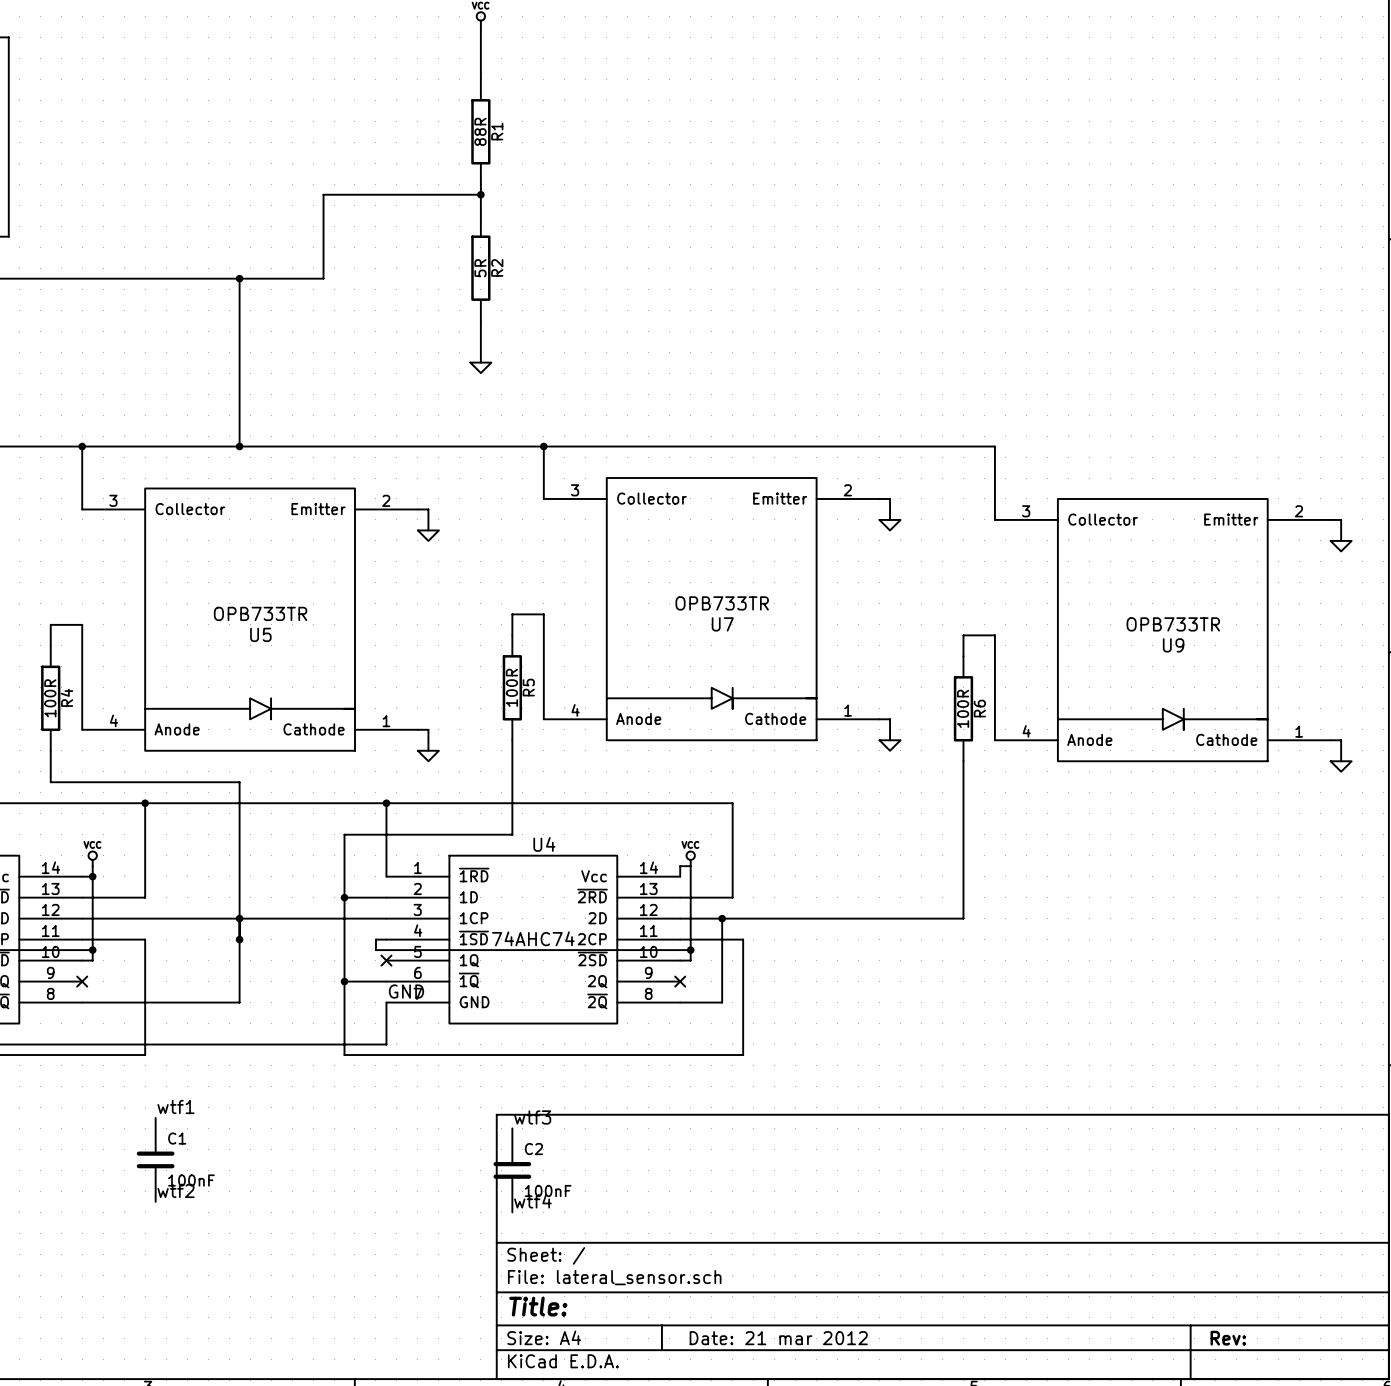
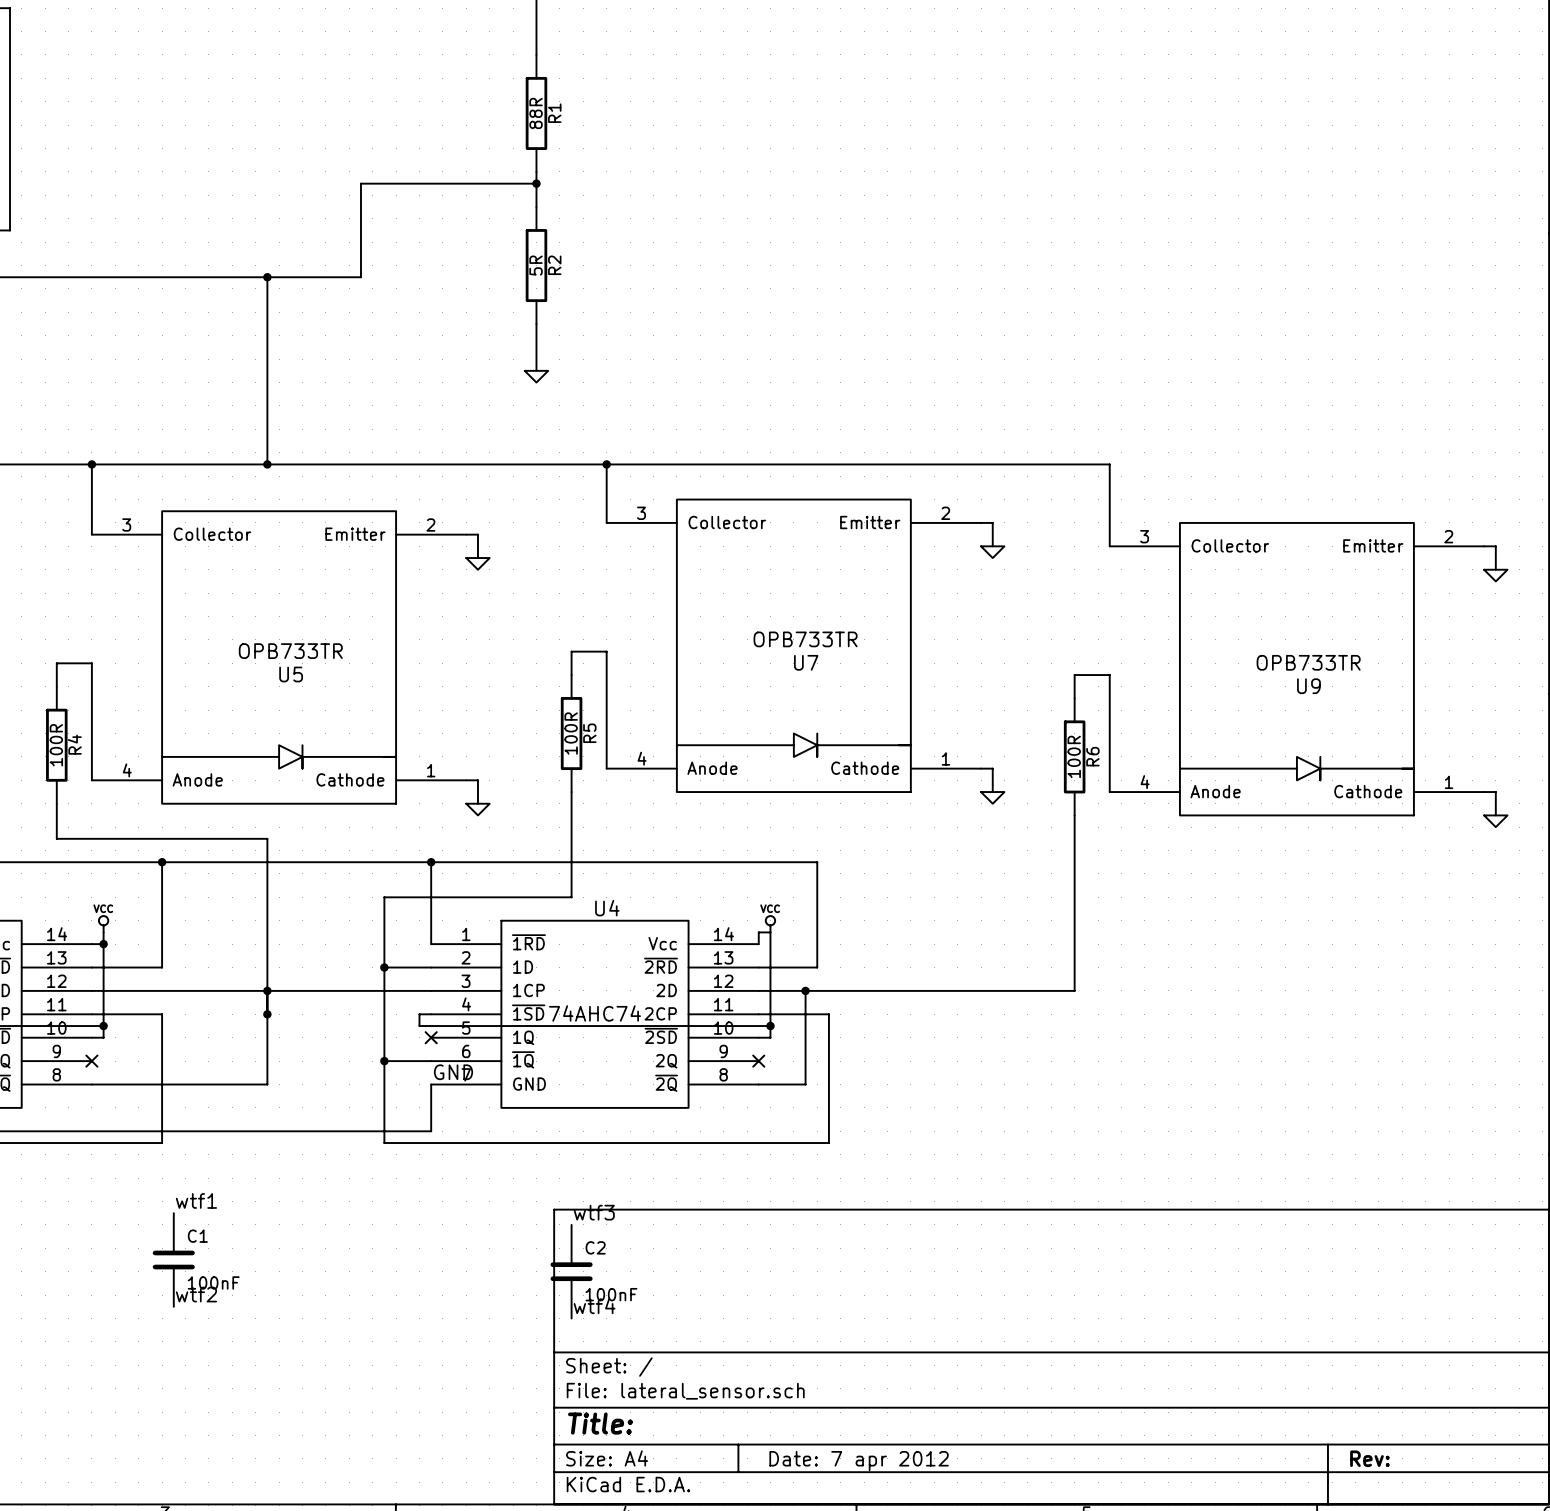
title block: Date: 21 mar 2012 (778, 1338) -> Date: 7 apr 2012 (859, 1461)

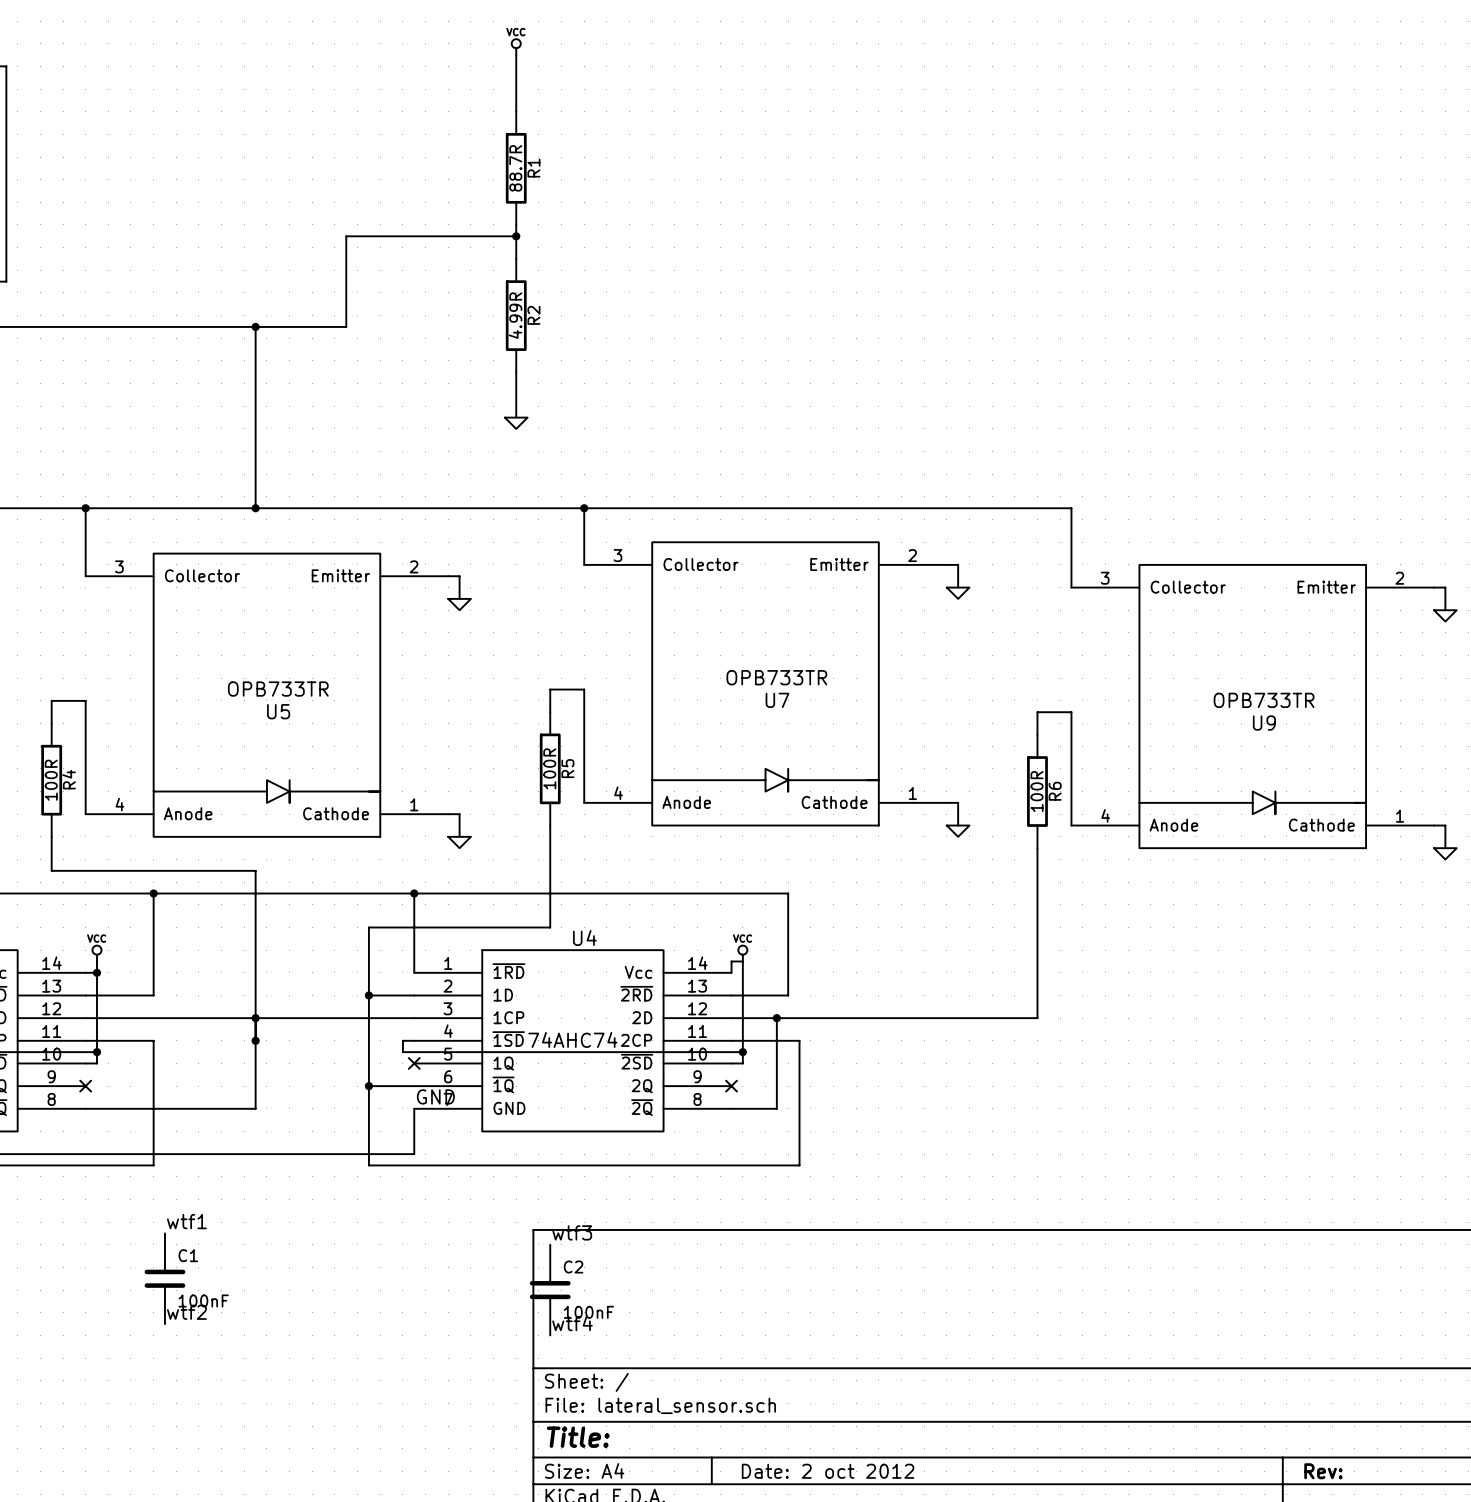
R1 value: 88R (536, 113) -> 88.7R (515, 168)
R2 value: 5R (536, 265) -> 4.99R (515, 315)
title block: Date: 7 apr 2012 (859, 1461) -> Date: 2 oct 2012 (828, 1471)

